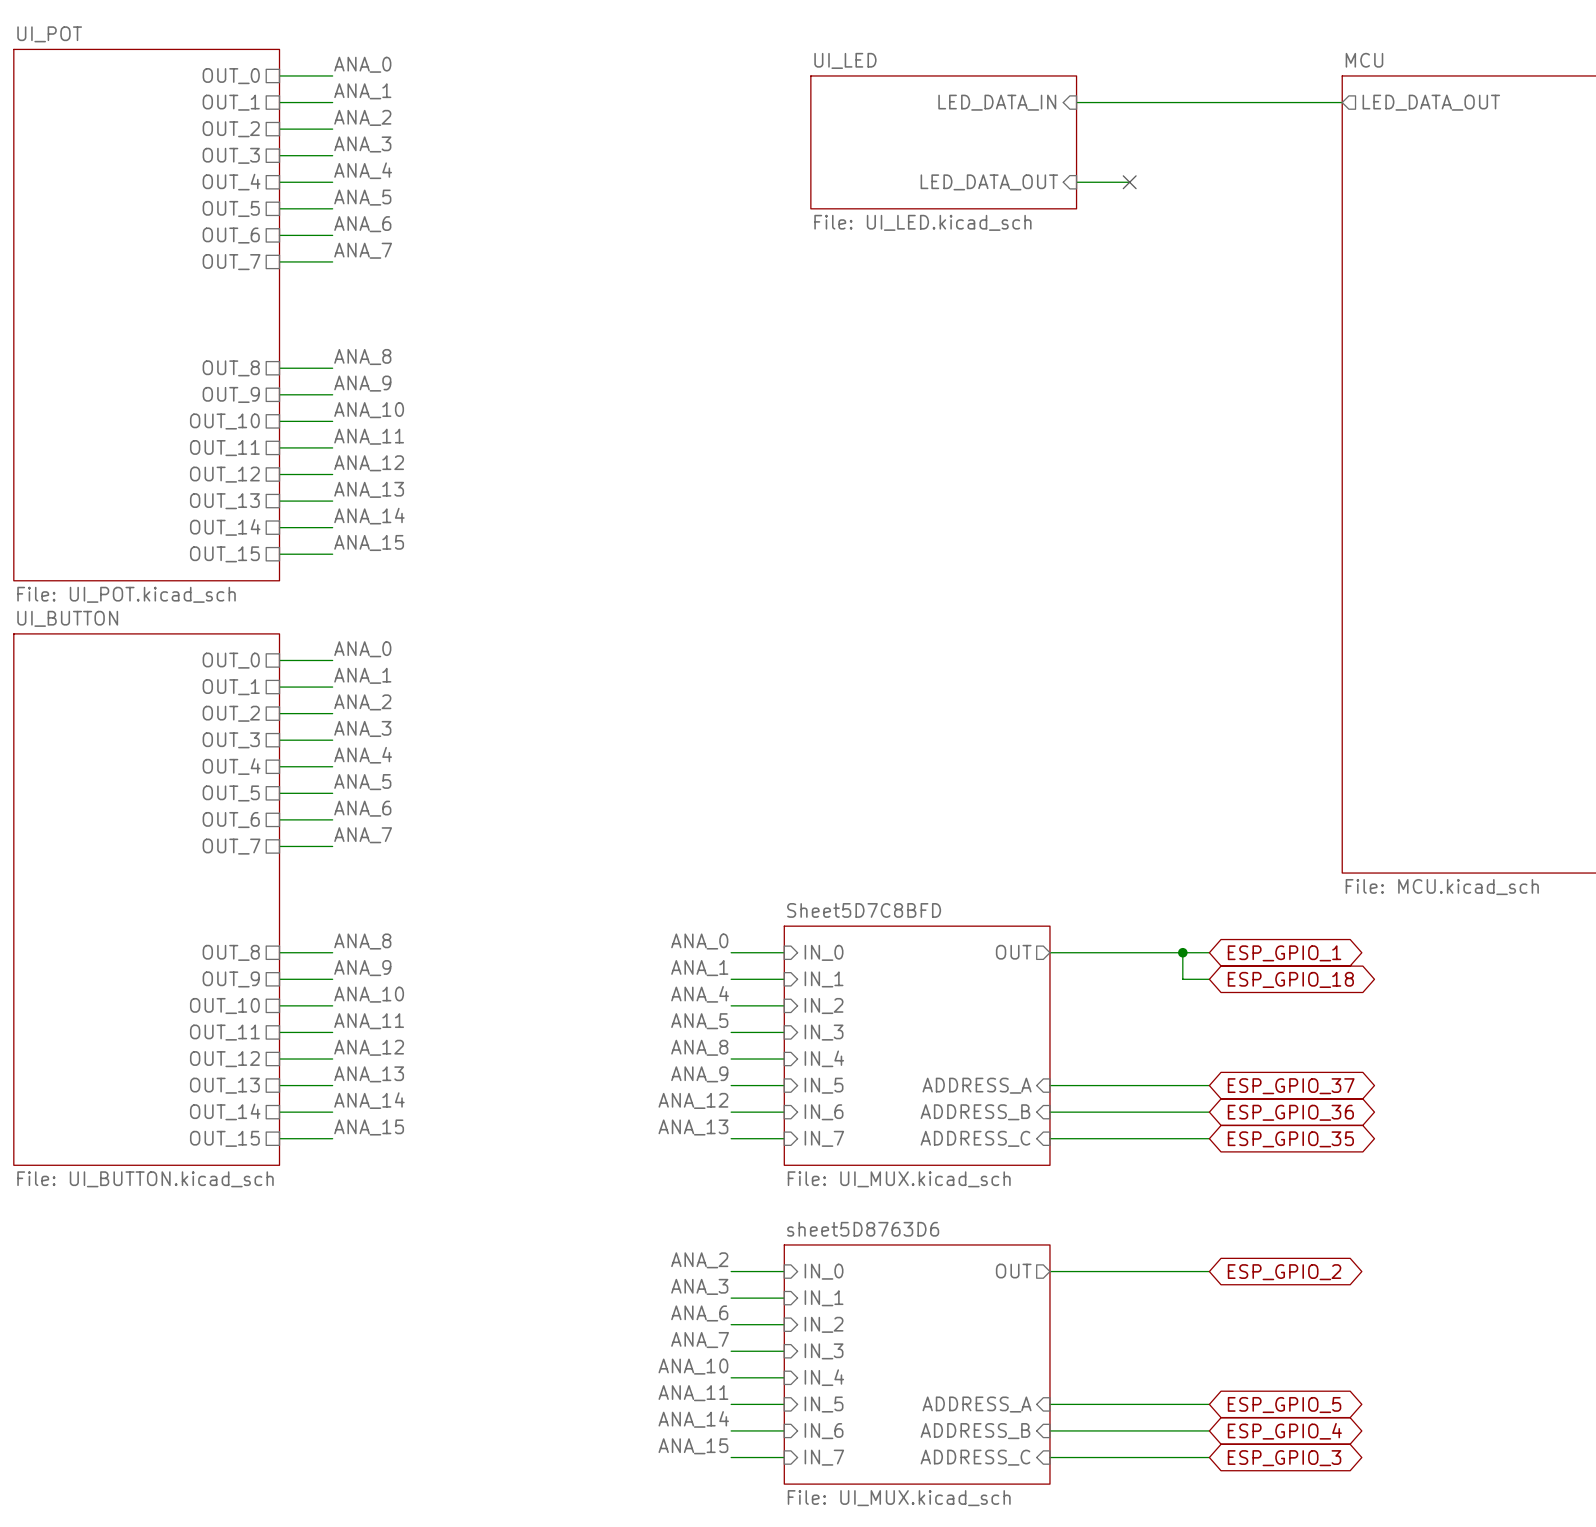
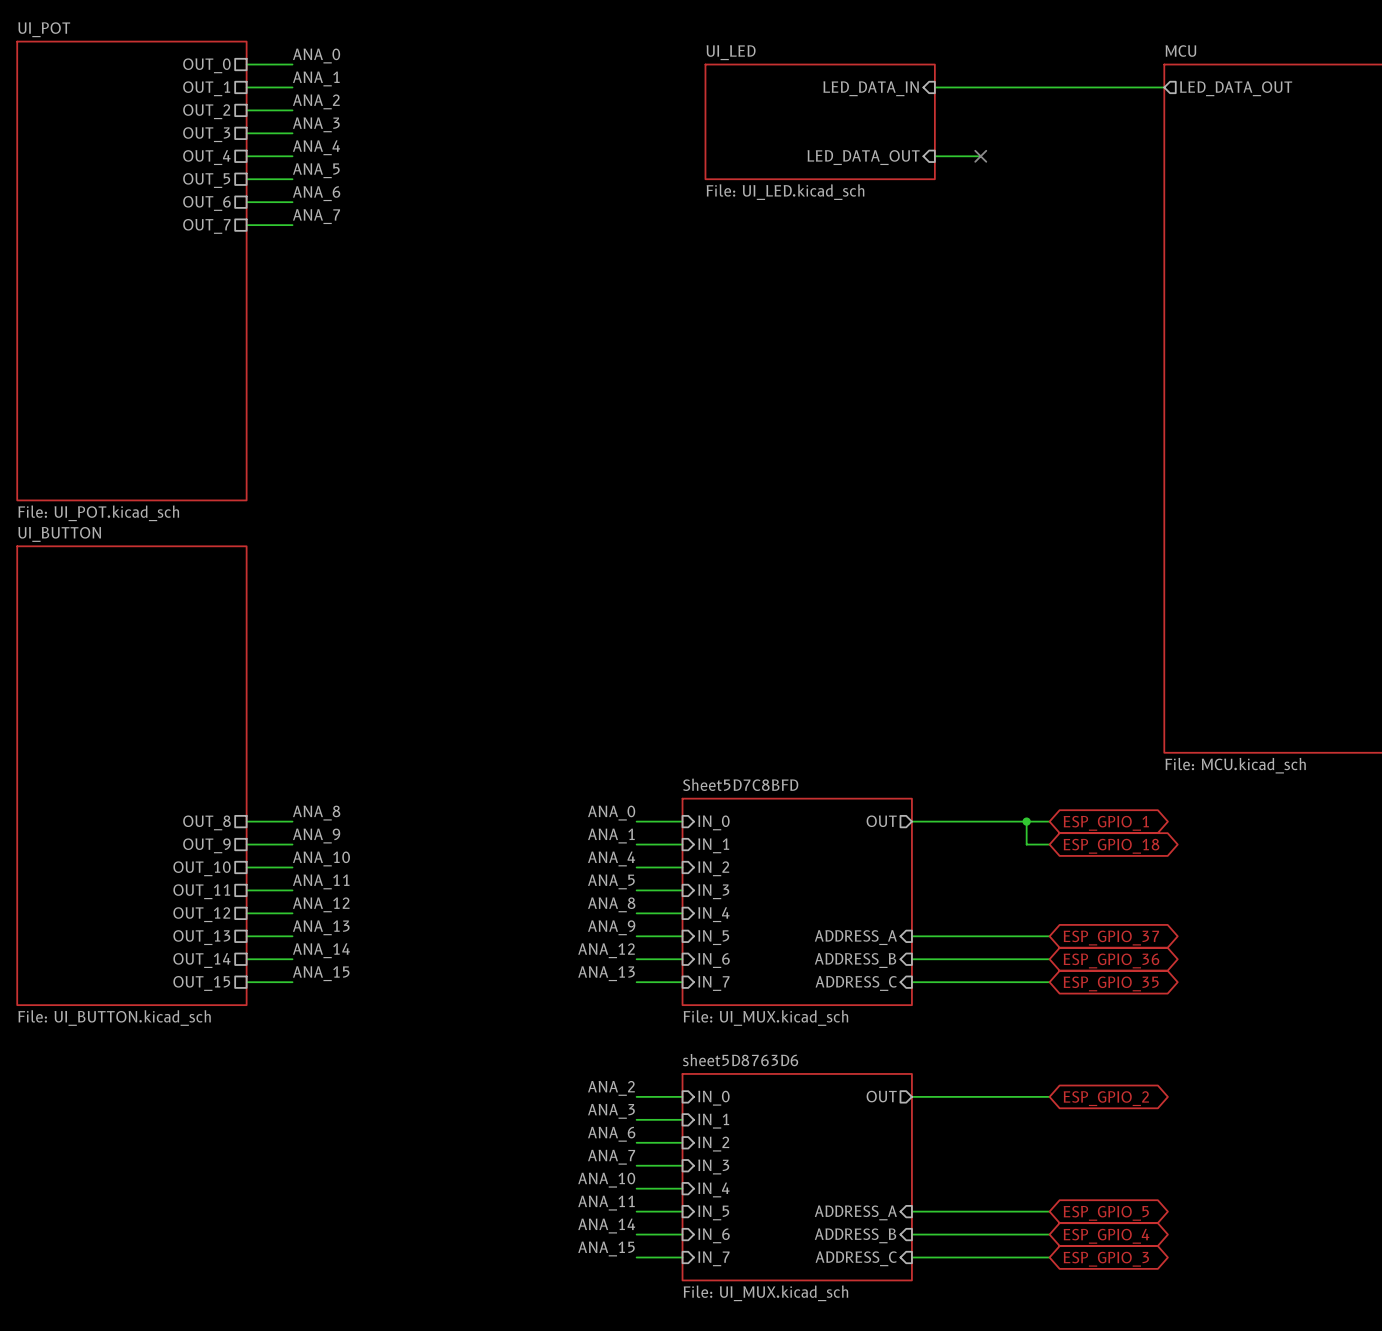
label: ANA_8 (362, 357) -> none
sheet pin: OUT_8 (231, 368) -> none
wire: (279, 368) (332, 368) -> none
label: ANA_9 (362, 383) -> none
sheet pin: OUT_9 (231, 394) -> none
wire: (279, 394) (332, 394) -> none
label: ANA_10 (369, 410) -> none
sheet pin: OUT_10 (224, 421) -> none
wire: (279, 421) (332, 421) -> none
label: ANA_11 (369, 436) -> none
wire: (279, 447) (332, 447) -> none
sheet pin: OUT_11 (224, 448) -> none
label: ANA_12 (369, 463) -> none
sheet pin: OUT_12 (224, 474) -> none
wire: (279, 474) (332, 474) -> none
label: ANA_13 (369, 489) -> none
sheet pin: OUT_13 (224, 501) -> none
wire: (279, 501) (332, 501) -> none
label: ANA_14 (369, 516) -> none
sheet pin: OUT_14 (225, 527) -> none
wire: (279, 527) (332, 527) -> none
label: ANA_15 (369, 542) -> none
sheet pin: OUT_15 (224, 554) -> none
wire: (279, 554) (332, 554) -> none
label: ANA_0 (362, 649) -> none
sheet pin: OUT_0 (231, 660) -> none
wire: (279, 660) (332, 660) -> none
label: ANA_1 (362, 675) -> none
sheet pin: OUT_1 (231, 687) -> none
wire: (279, 687) (332, 687) -> none
label: ANA_2 (362, 702) -> none
sheet pin: OUT_2 (231, 713) -> none
wire: (279, 713) (332, 713) -> none
label: ANA_3 (362, 728) -> none
sheet pin: OUT_3 (231, 740) -> none
wire: (279, 740) (332, 740) -> none
label: ANA_4 (363, 755) -> none
sheet pin: OUT_4 (231, 766) -> none
wire: (279, 766) (332, 766) -> none
label: ANA_5 (362, 782) -> none
sheet pin: OUT_5 (231, 793) -> none
wire: (279, 793) (332, 793) -> none
label: ANA_6 (362, 808) -> none
wire: (279, 819) (332, 819) -> none
sheet pin: OUT_6 (231, 820) -> none
label: ANA_7 (363, 835) -> none
sheet pin: OUT_7 (231, 846) -> none
wire: (279, 846) (332, 846) -> none

